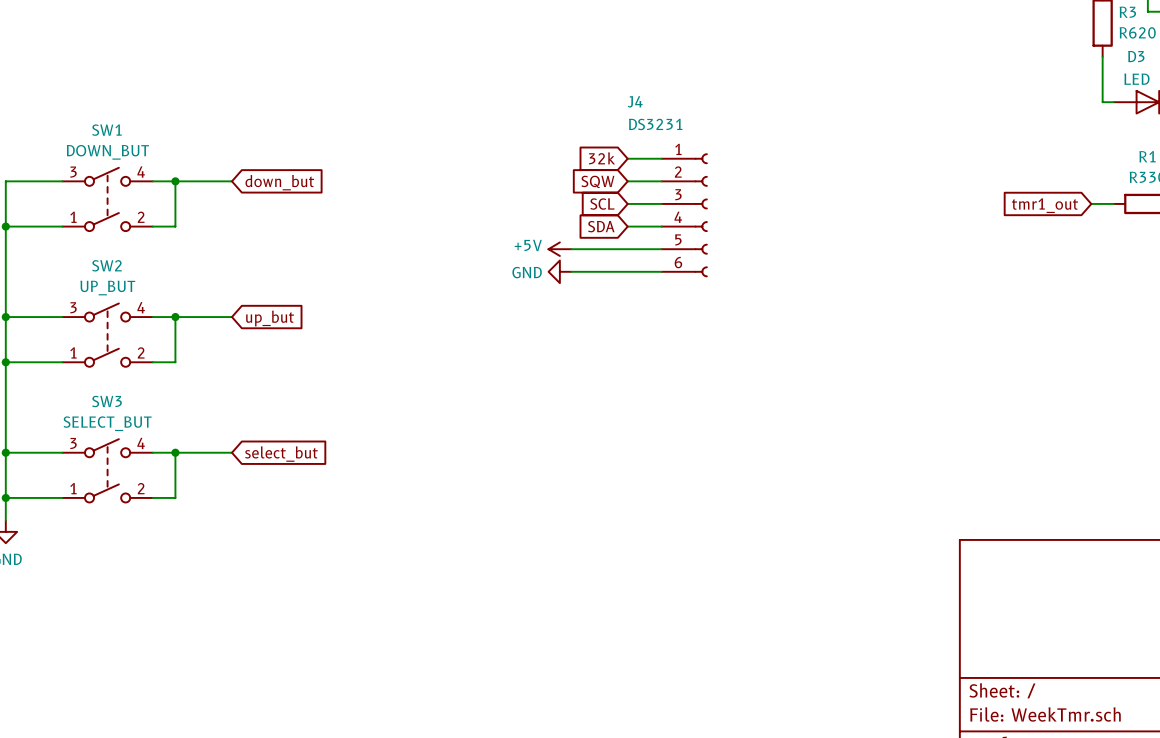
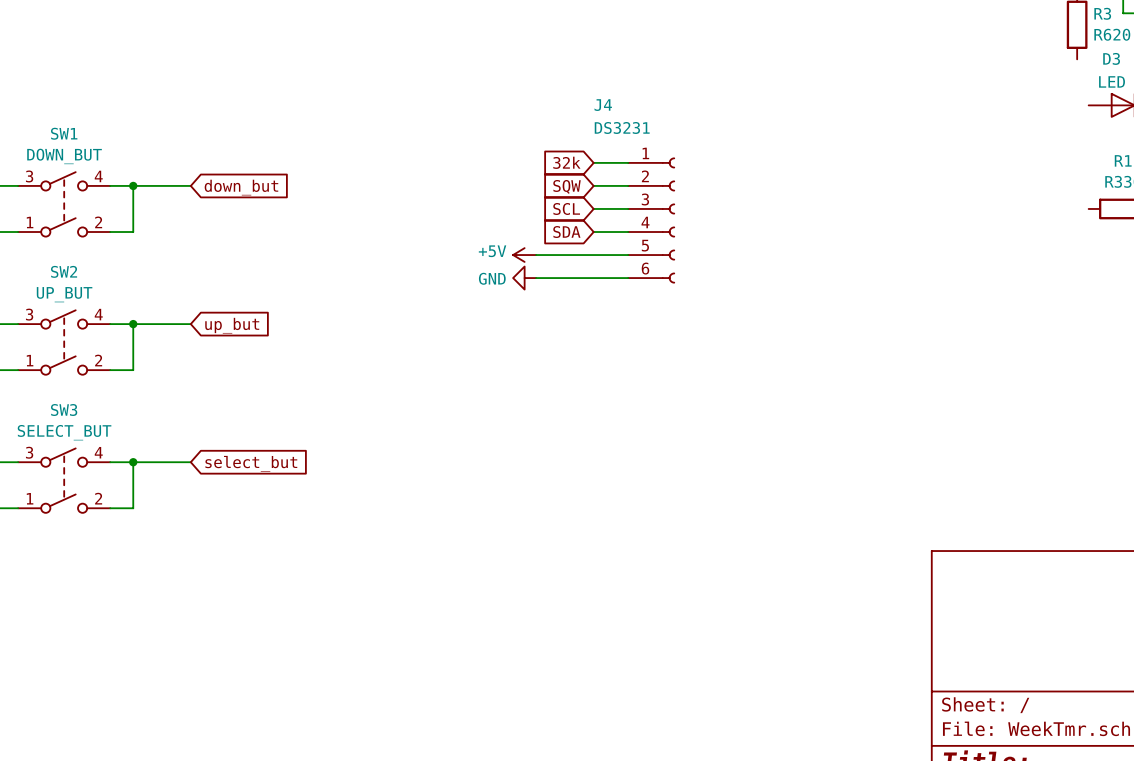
wire: (1102, 56) (1102, 102) (1113, 102) -> none
wire: (1091, 203) (1113, 203) -> none
global label: tmr1_out (1045, 205) -> none

